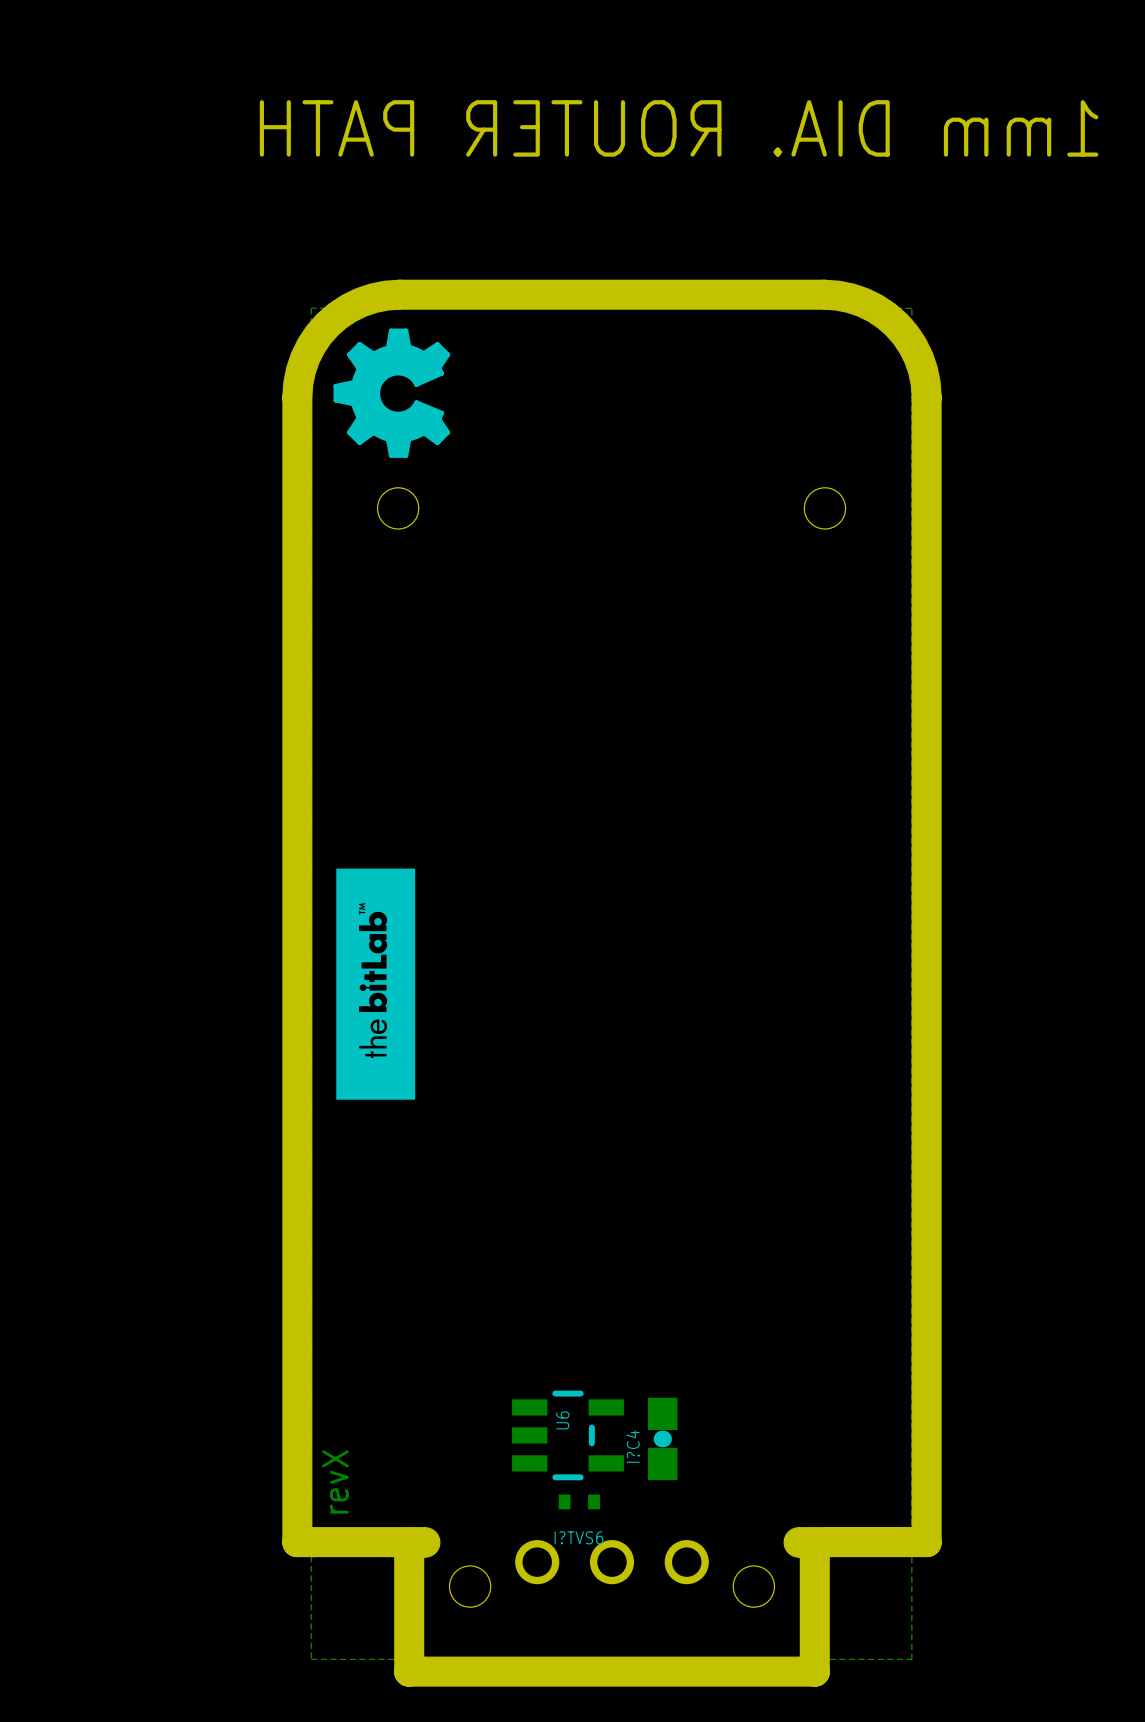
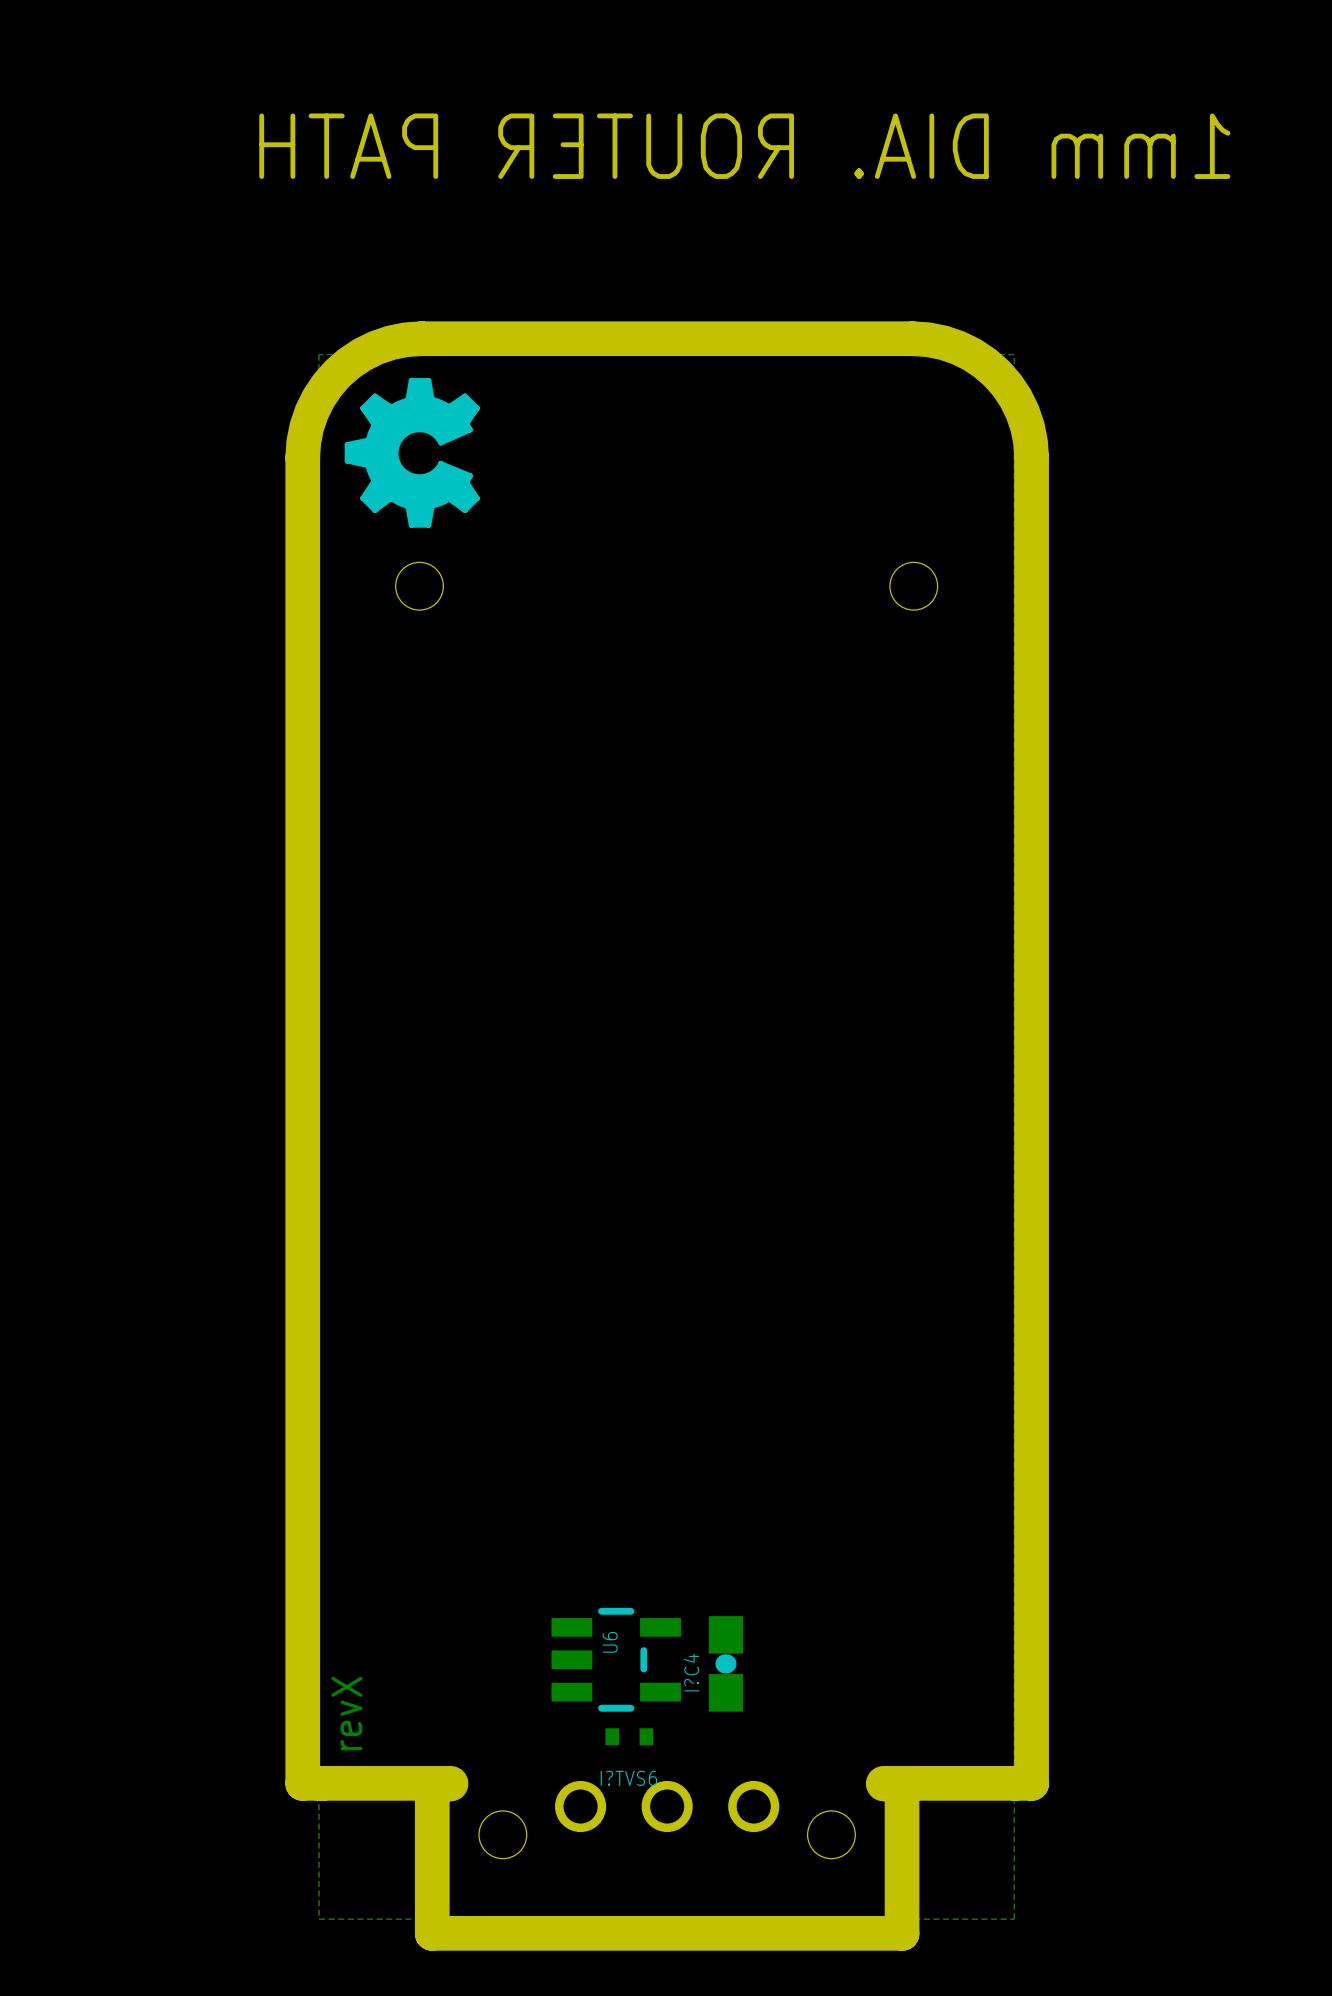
drawing: [336, 868, 416, 1100] -> none

